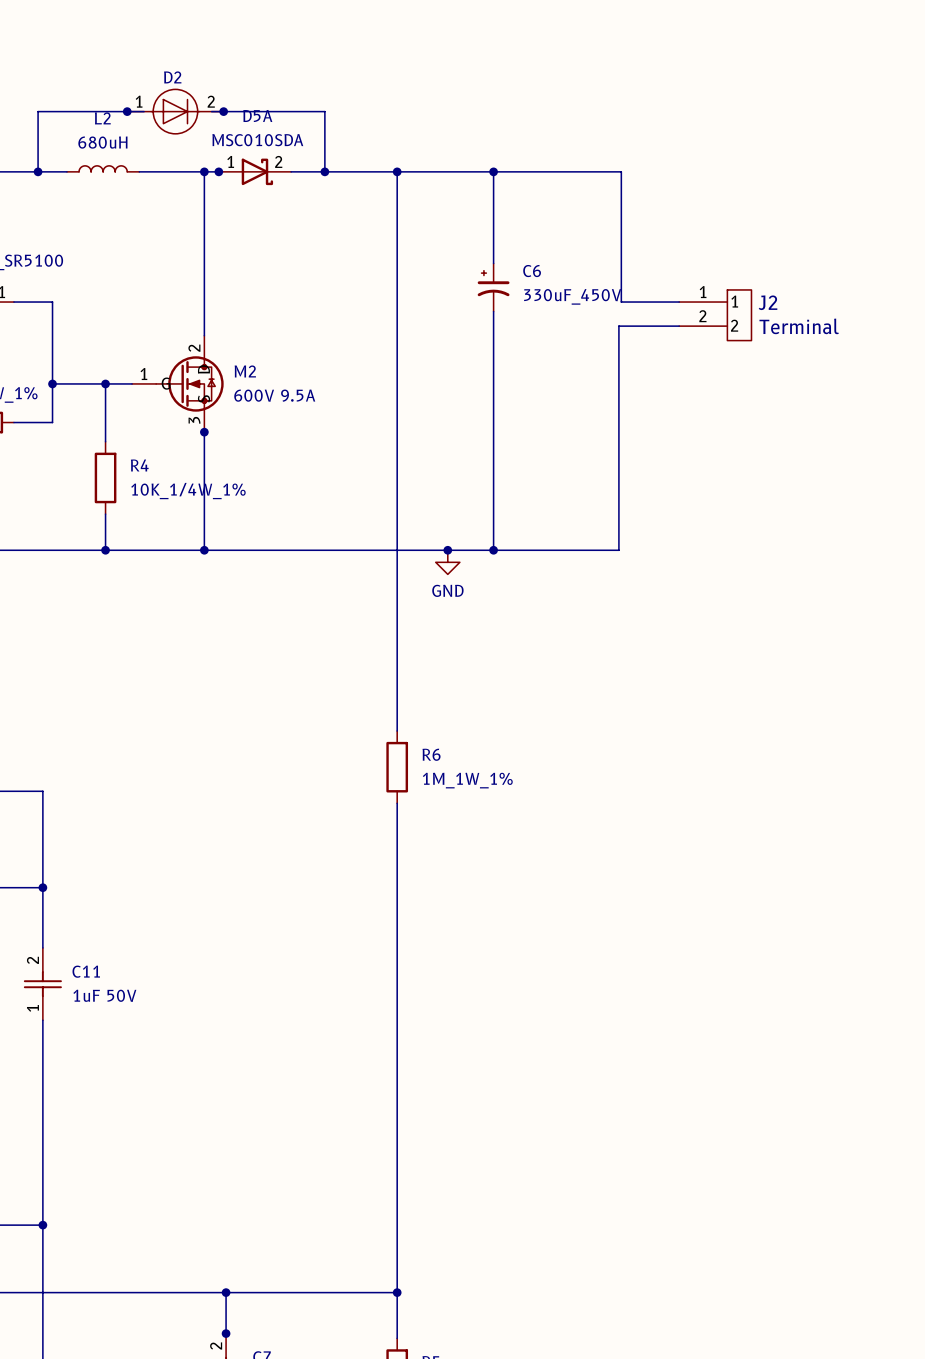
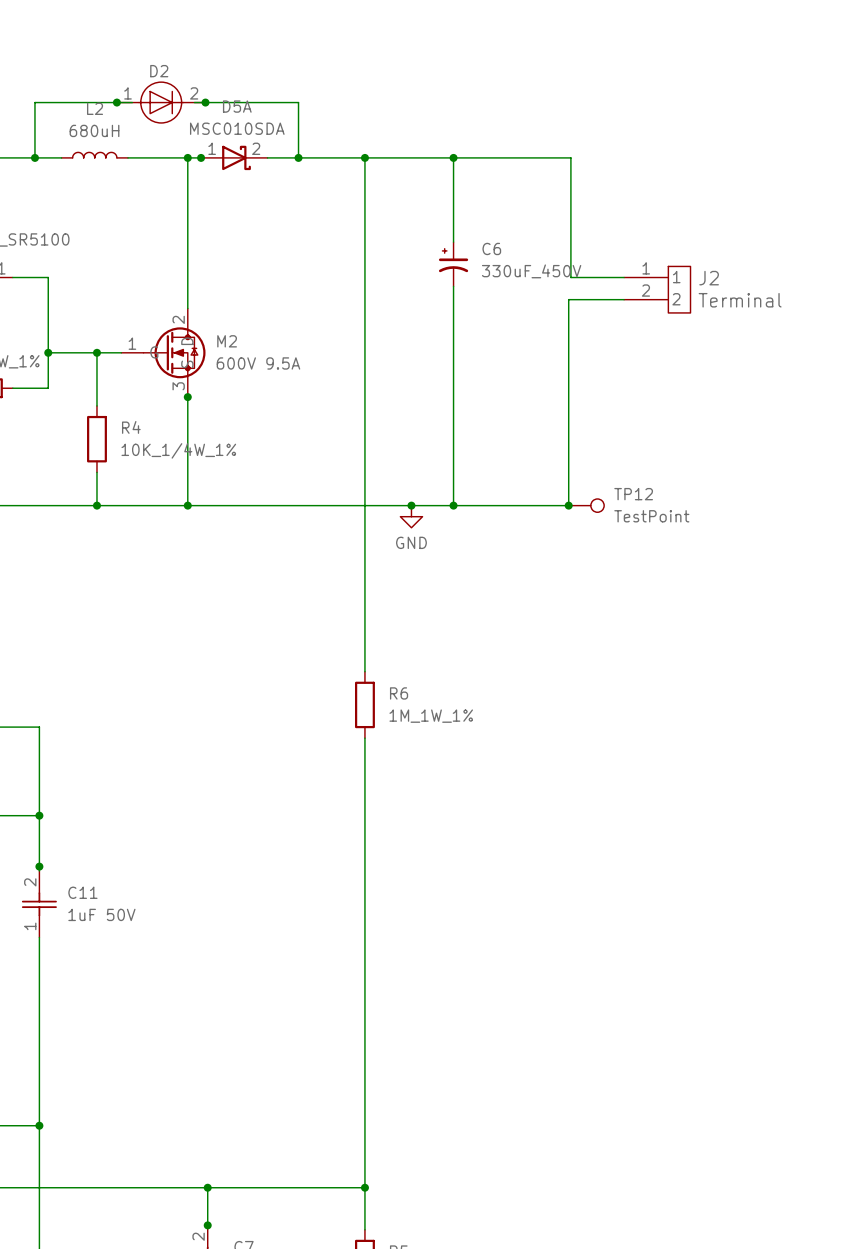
junction: none -> (568, 505)
TP12: none -> TestPoint (586, 505)
junction: none -> (39, 866)

